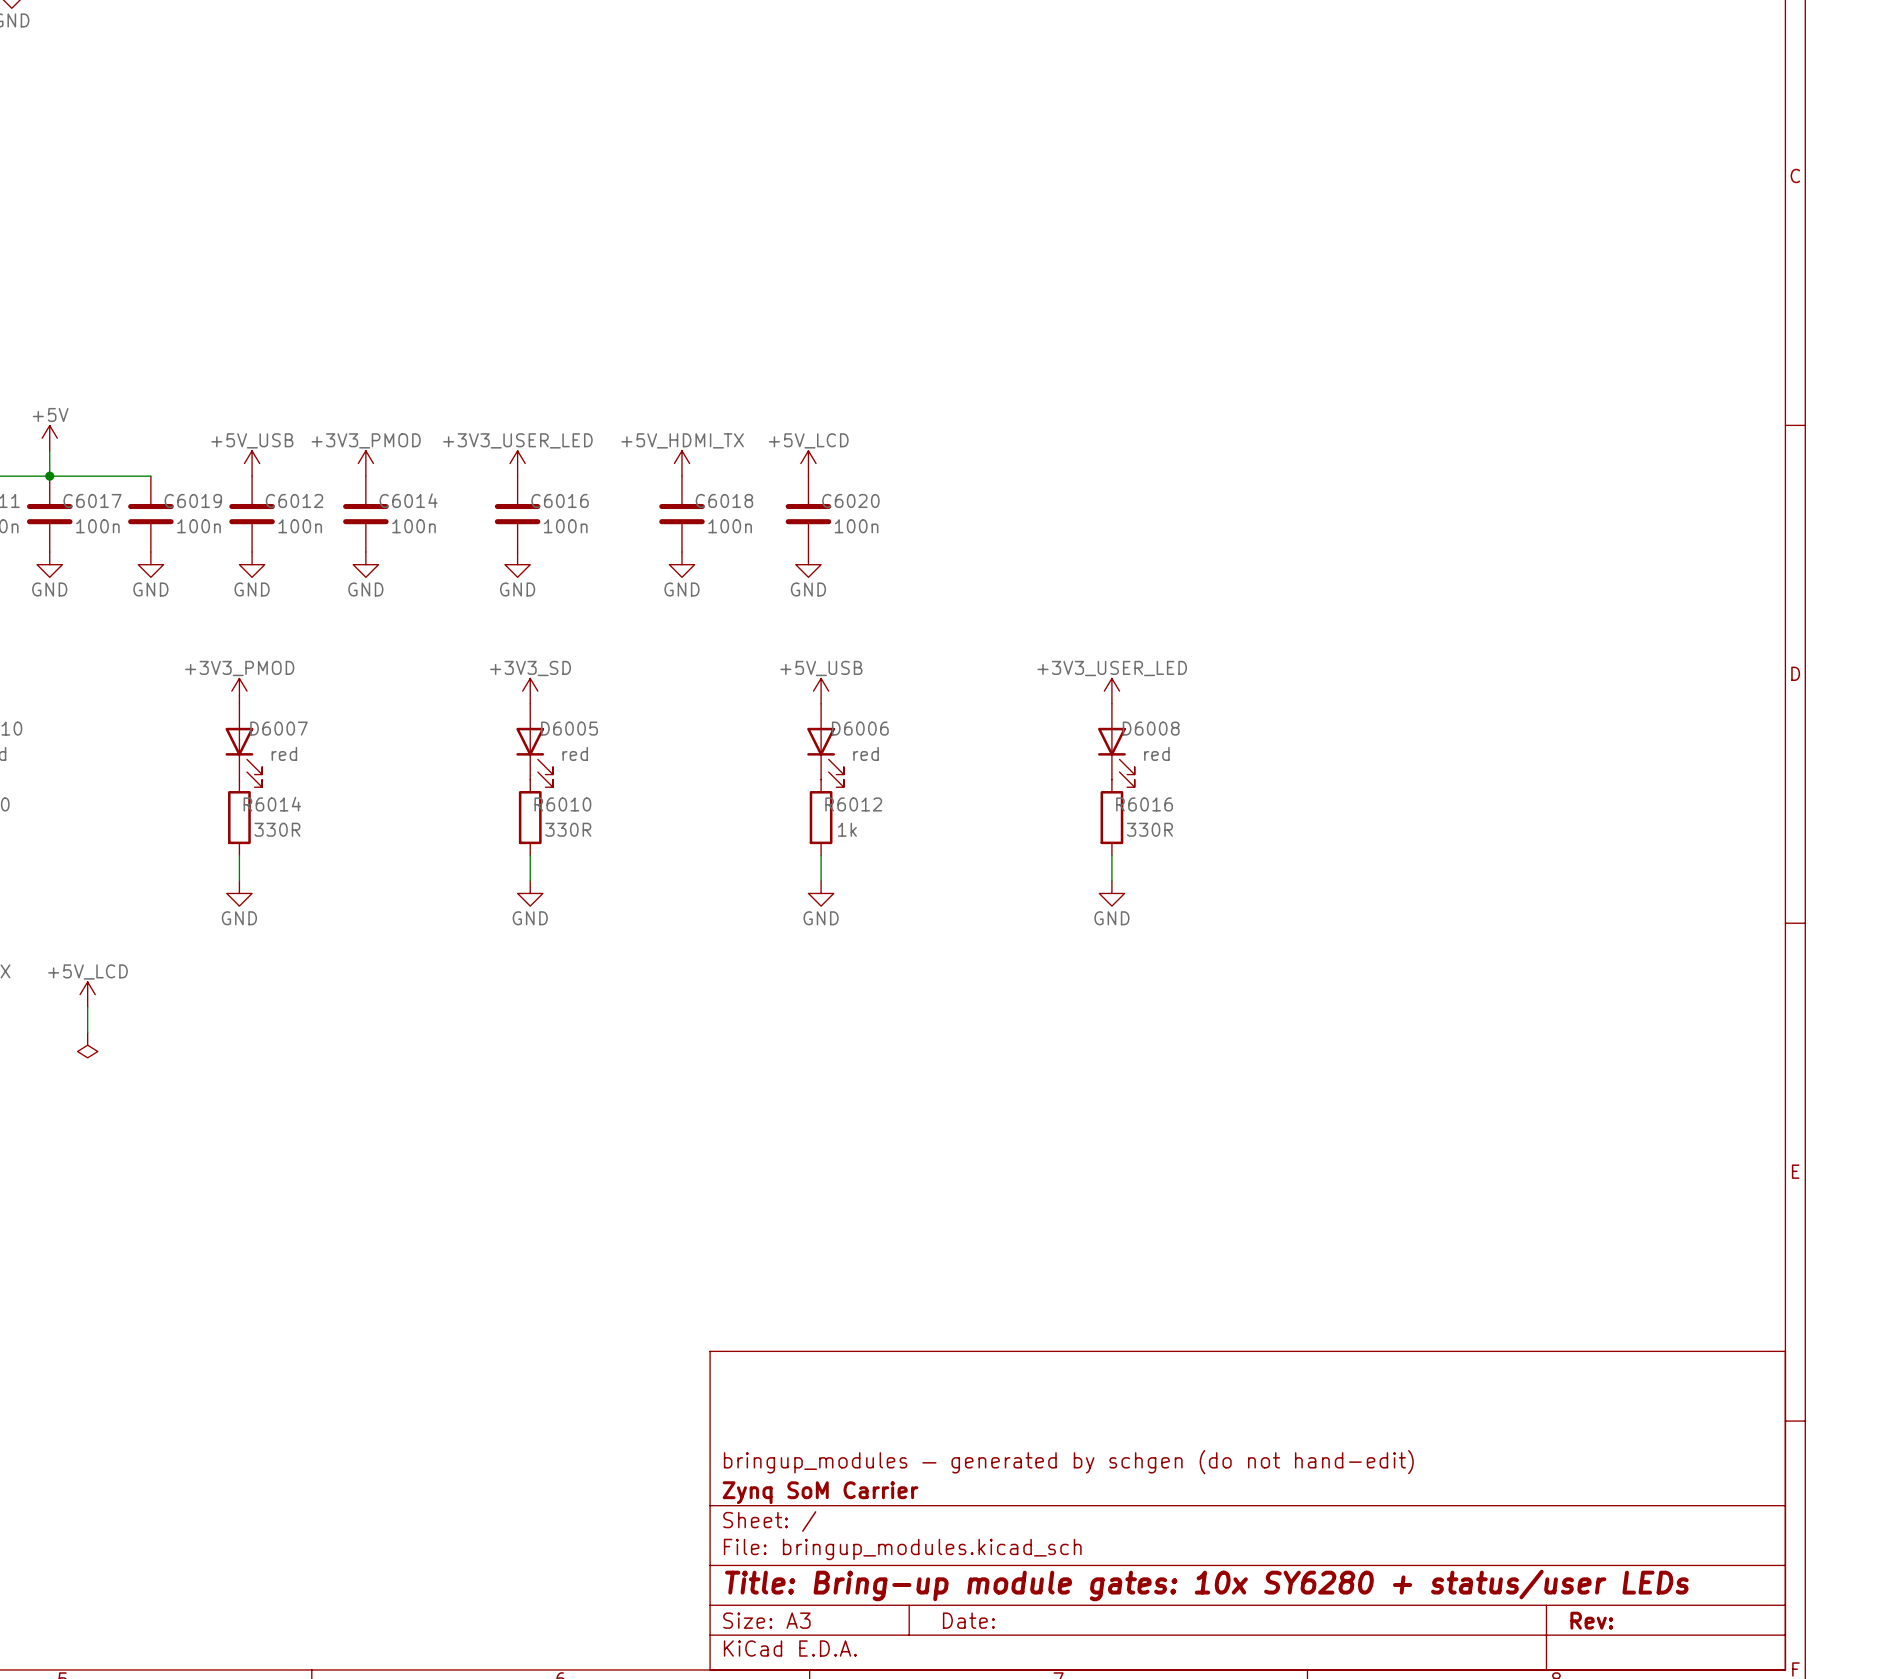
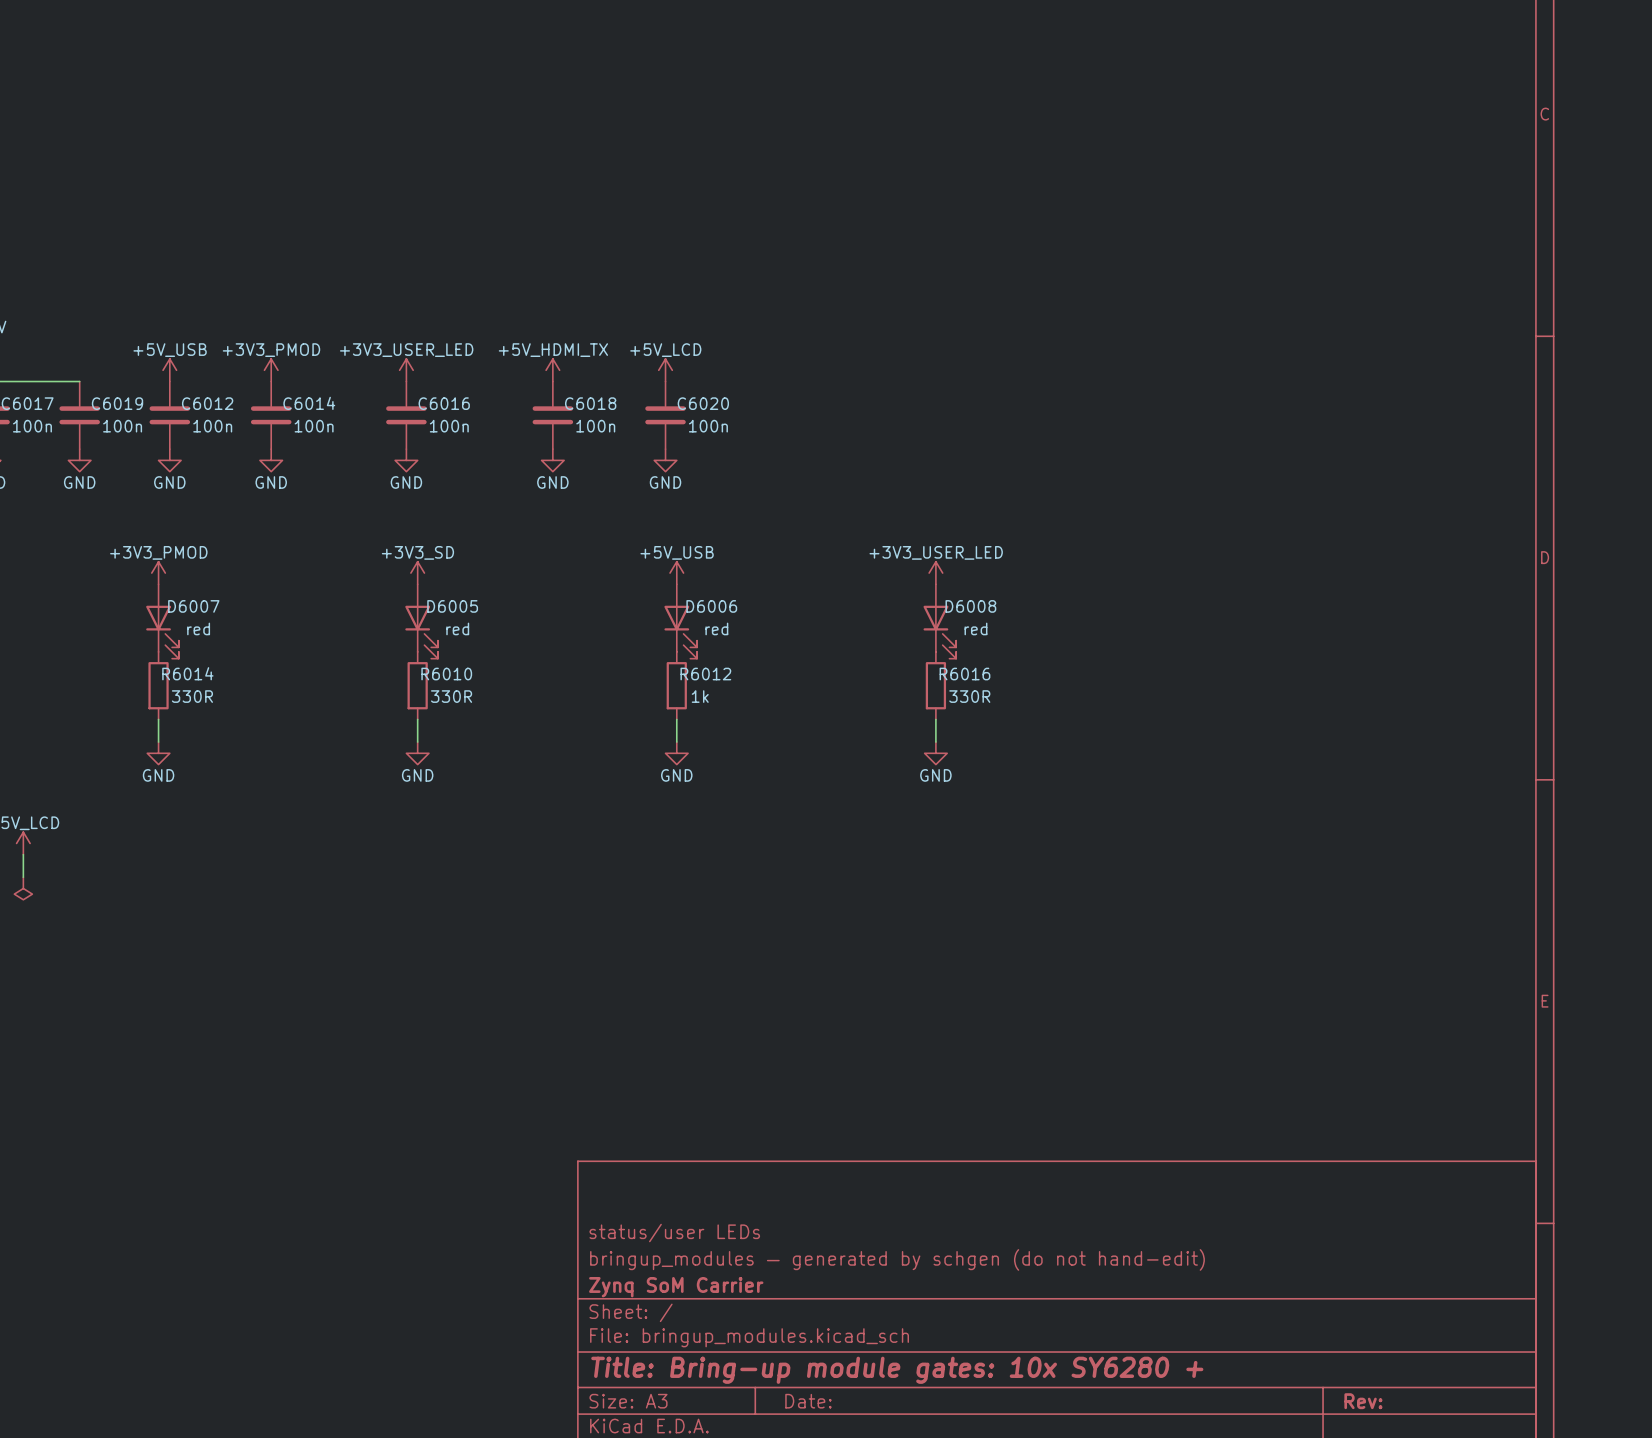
title block: none -> status/user LEDs (674, 1233)
title block: Title: Bring-up module gates: 10x SY6280 + status/user LEDs (1206, 1585) -> Title: Bring-up module gates: 10x SY6280 + (897, 1370)

